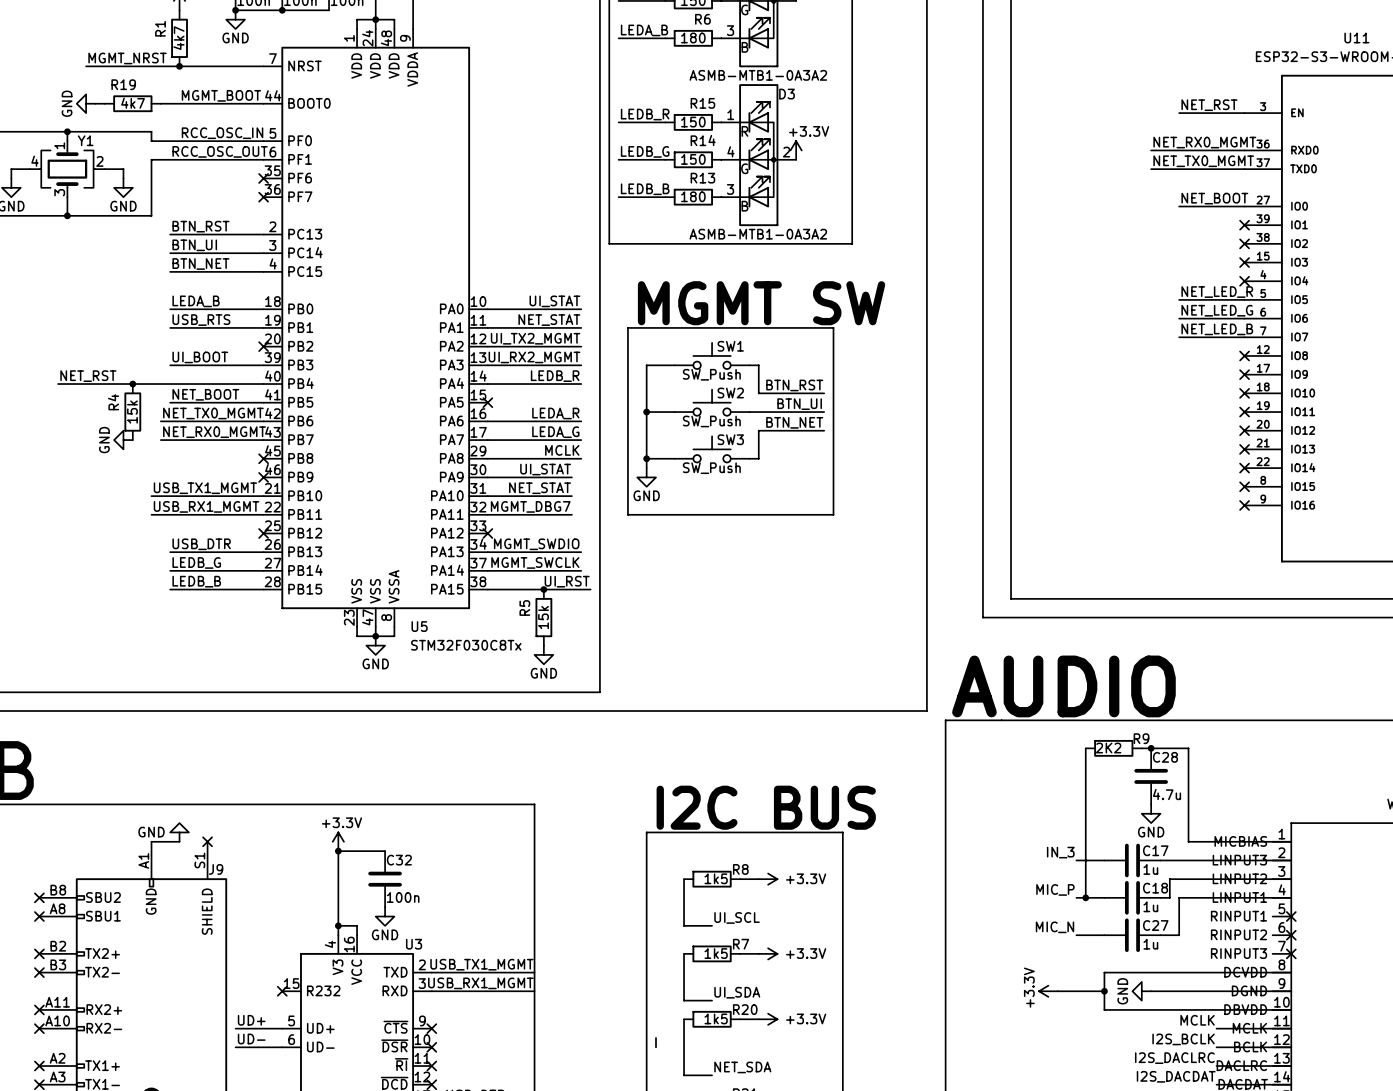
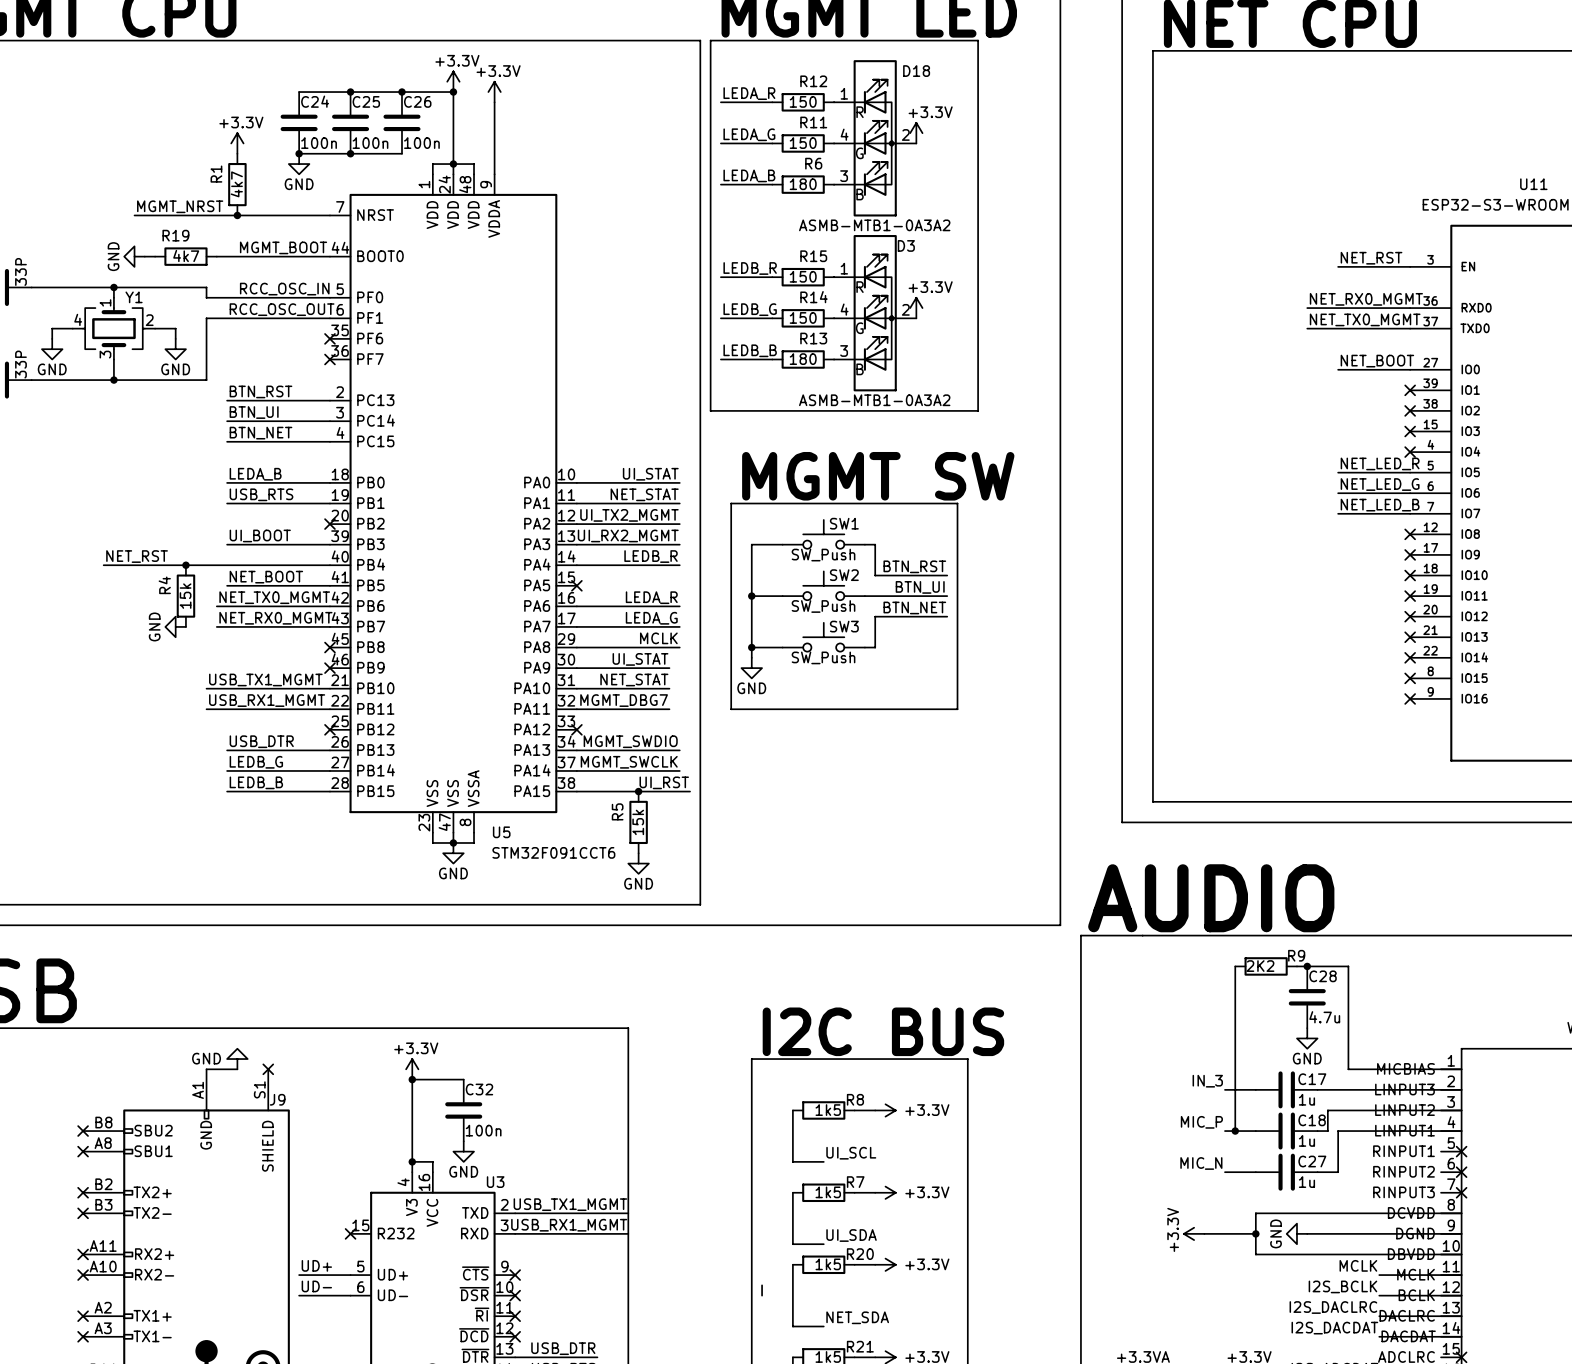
U5 value: STM32F030C8Tx (466, 645) -> STM32F091CCT6 (553, 852)

